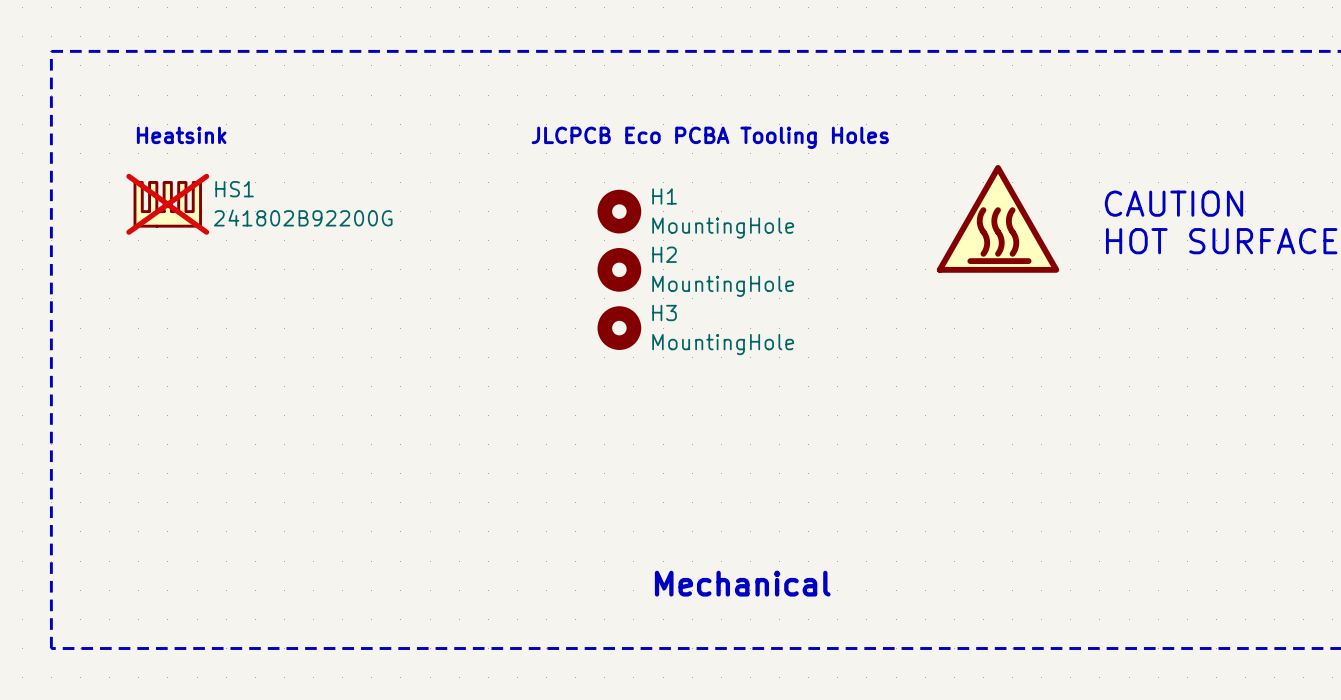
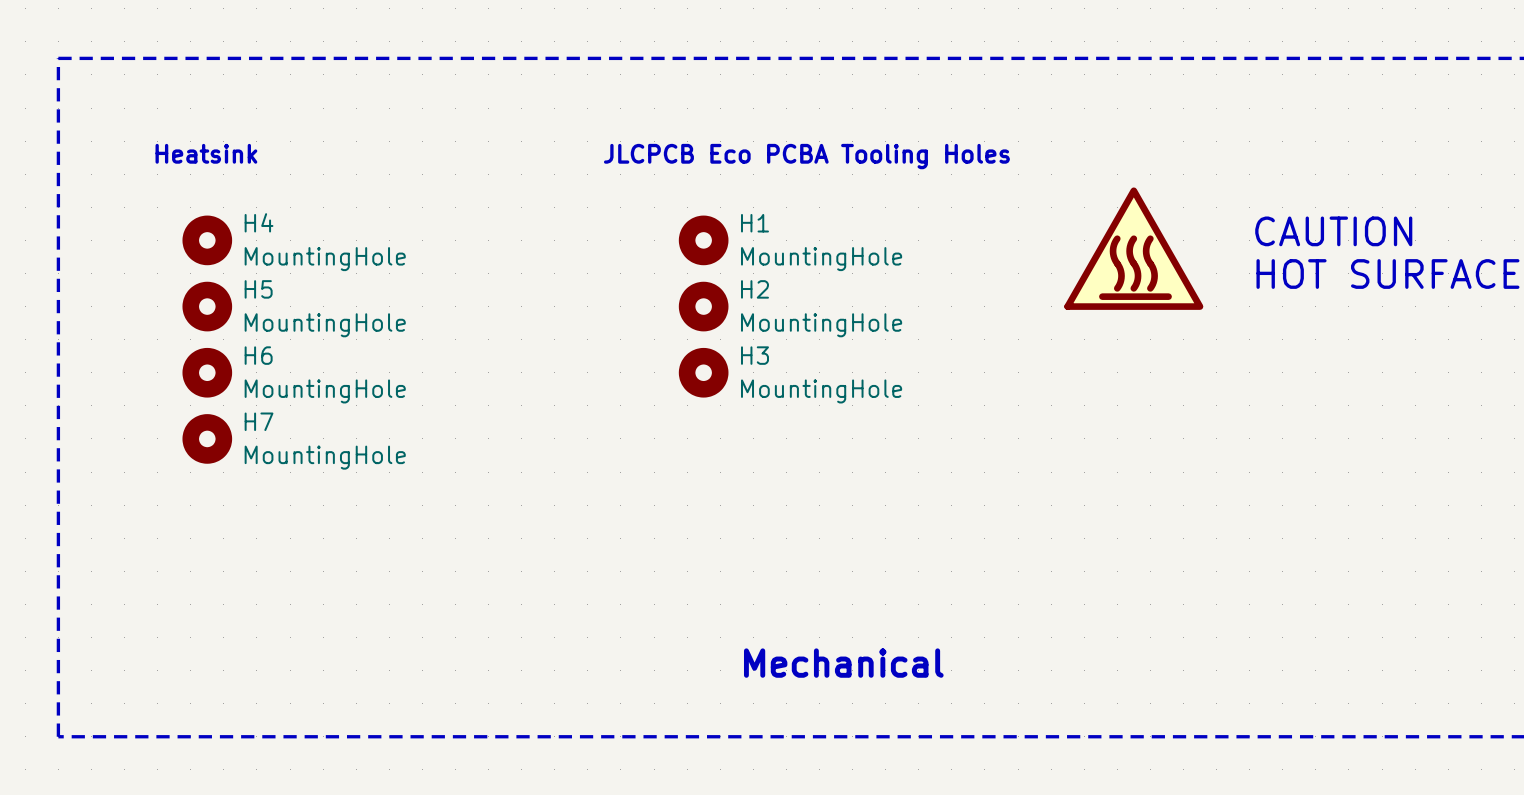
HS1: 241802B92200G (167, 204) -> none
H4: none -> MountingHole (207, 240)
H5: none -> MountingHole (207, 306)
H6: none -> MountingHole (207, 372)
H7: none -> MountingHole (207, 438)

